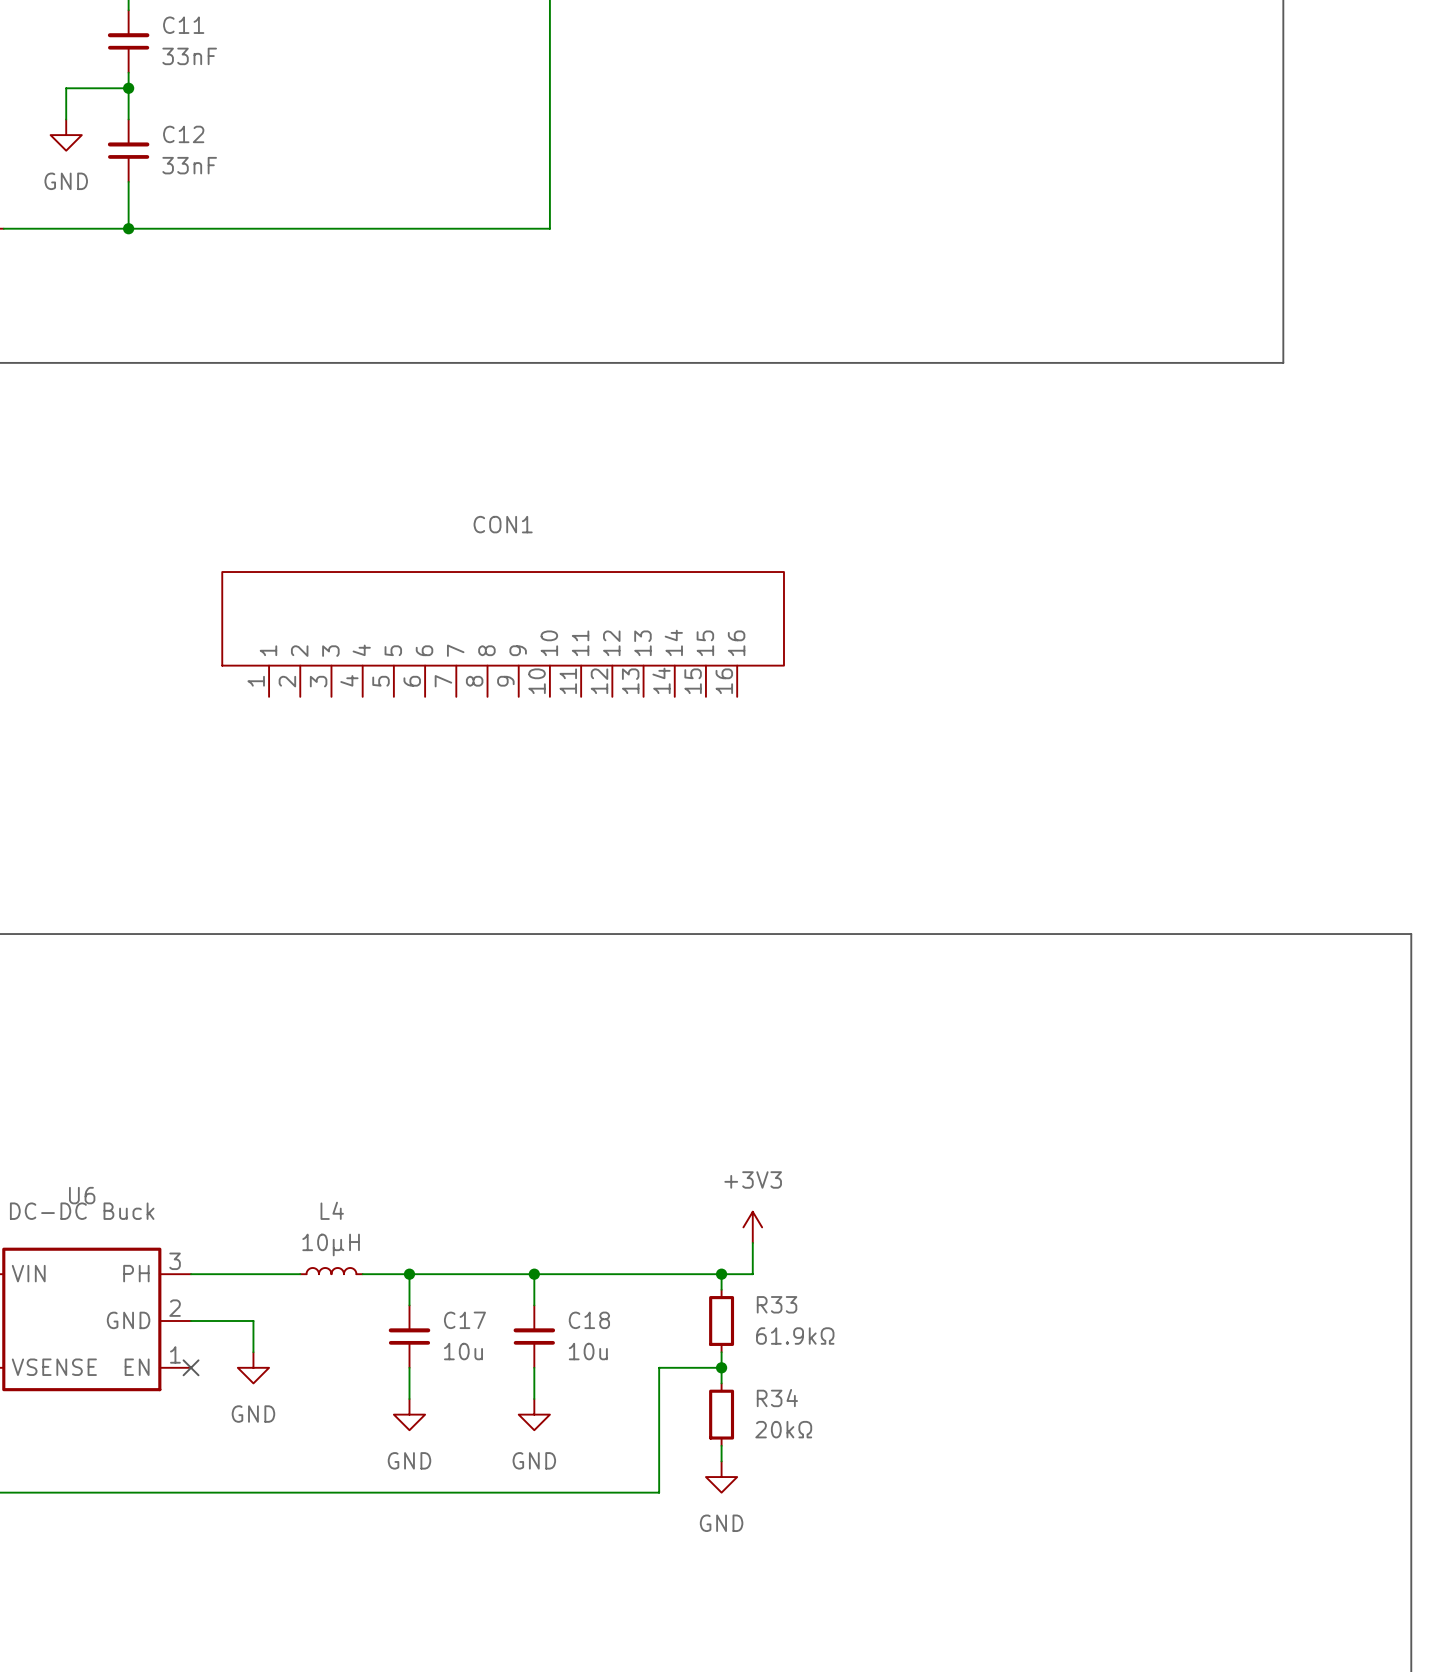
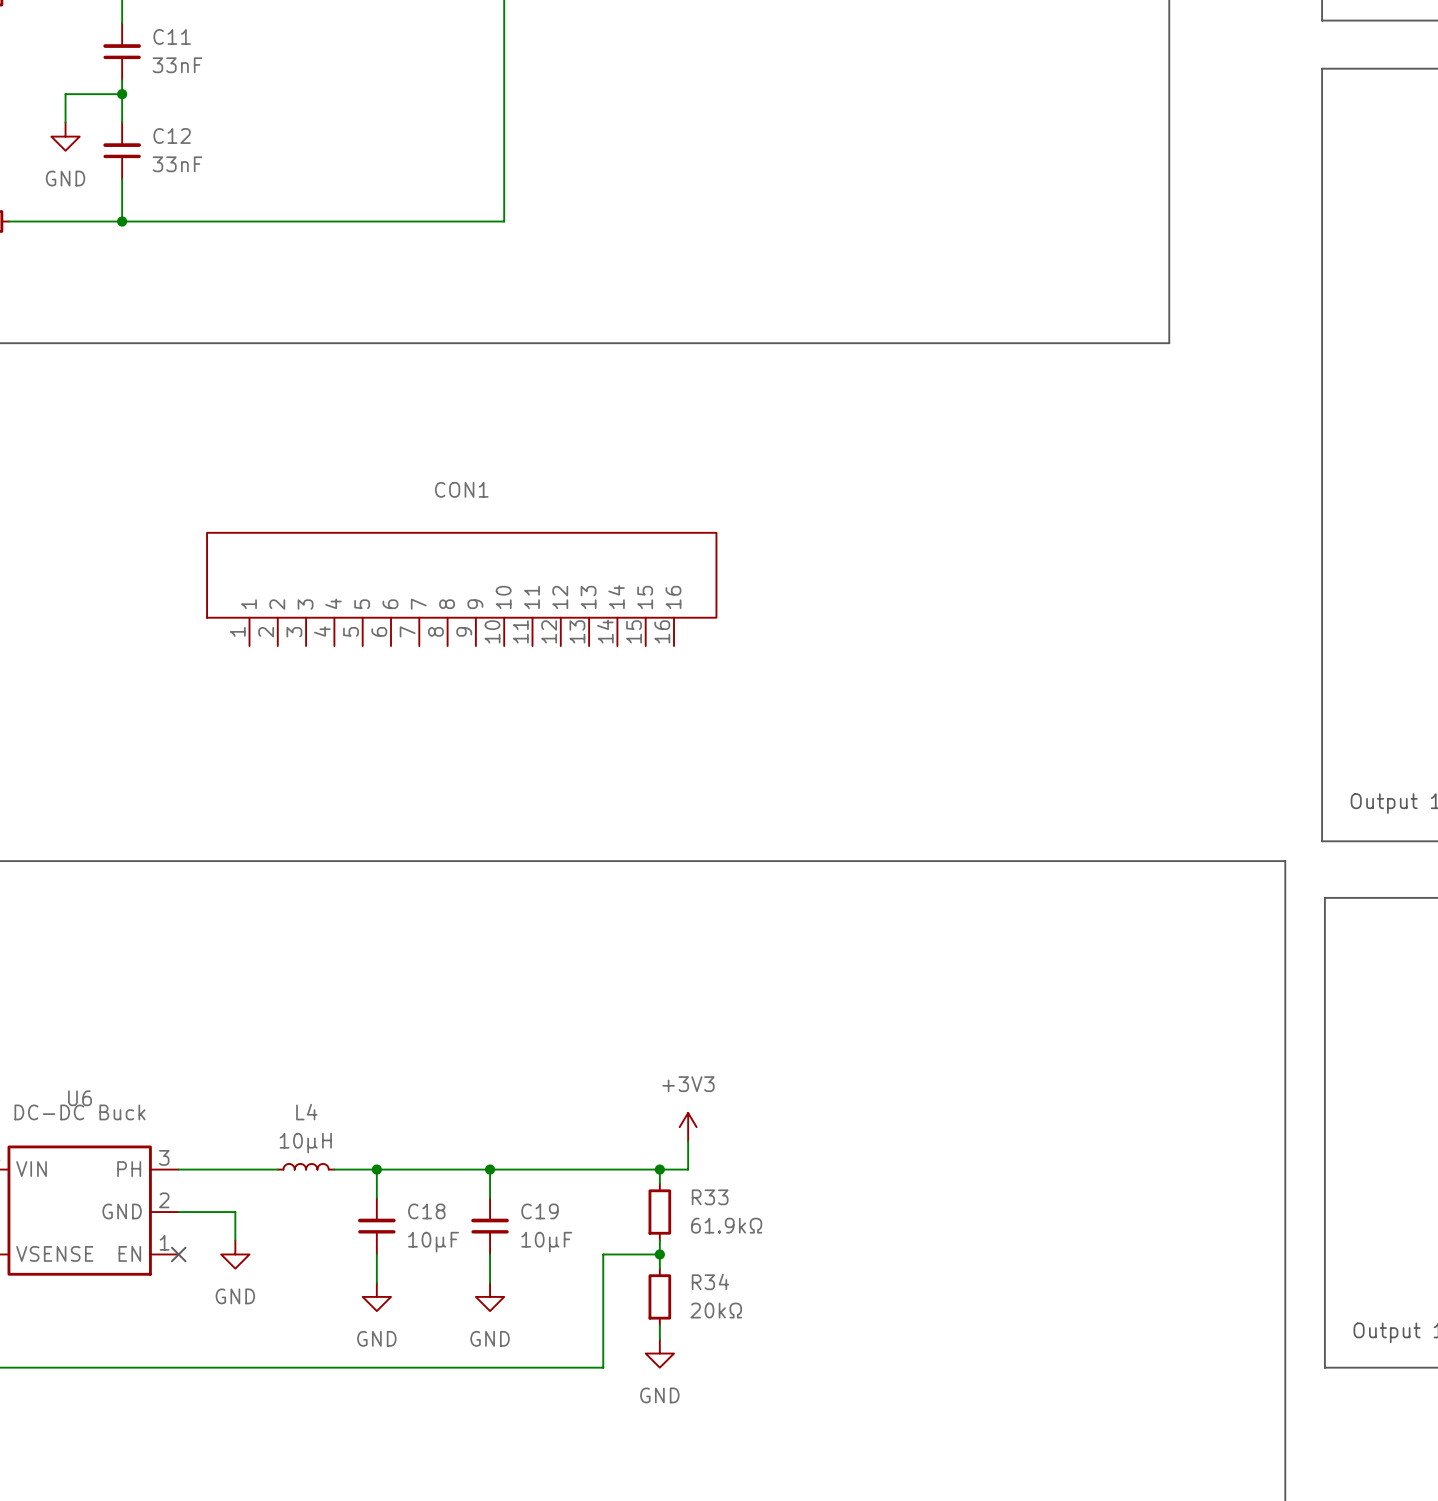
C17 name: C17 (464, 1320) -> C18 (426, 1211)
C18 name: C18 (589, 1320) -> C19 (540, 1211)
C17 text: 10u (463, 1351) -> 10µF (433, 1242)
C18 text: 10u (588, 1351) -> 10µF (546, 1242)

